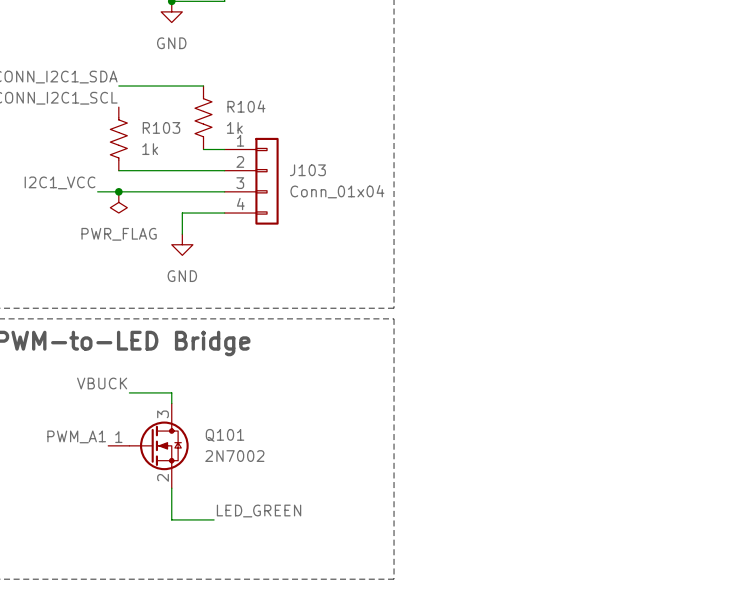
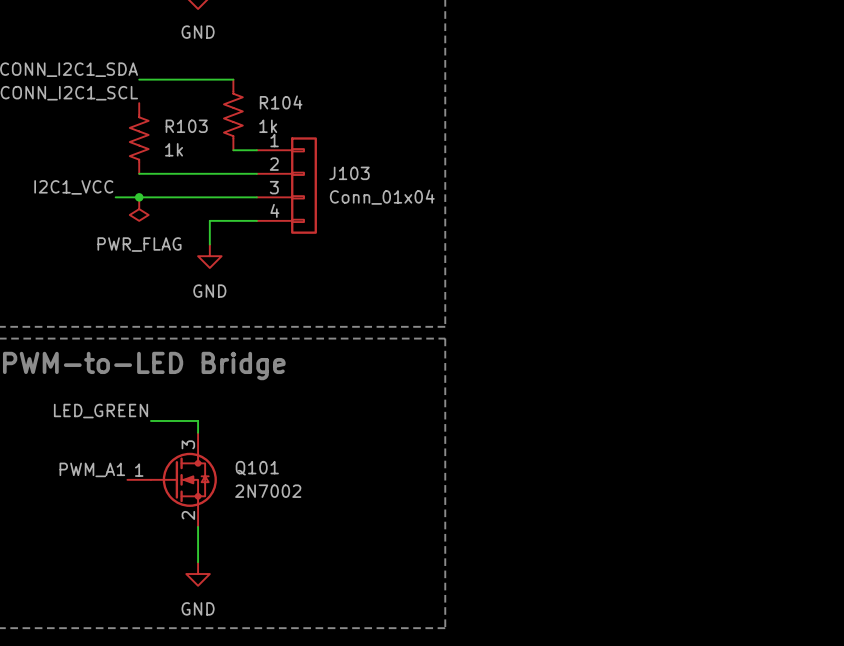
label: VBUCK (102, 383) -> LED_GREEN (101, 411)
label: LED_GREEN (259, 511) -> none
wire: (171, 519) (214, 519) -> none
power symbol: none -> GND (198, 574)

